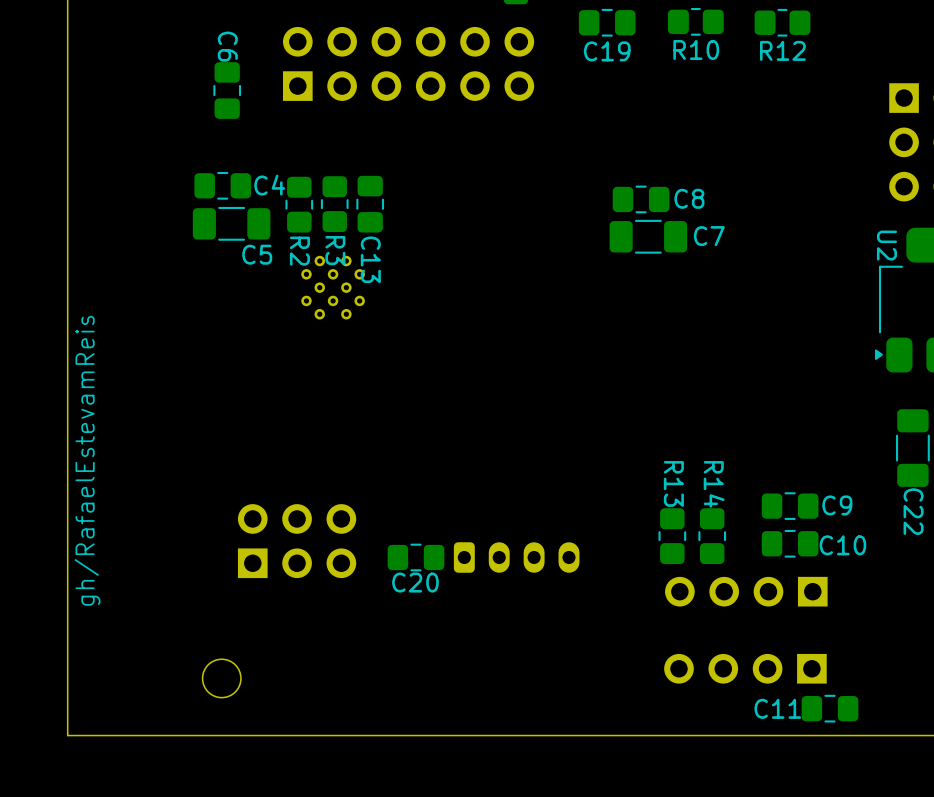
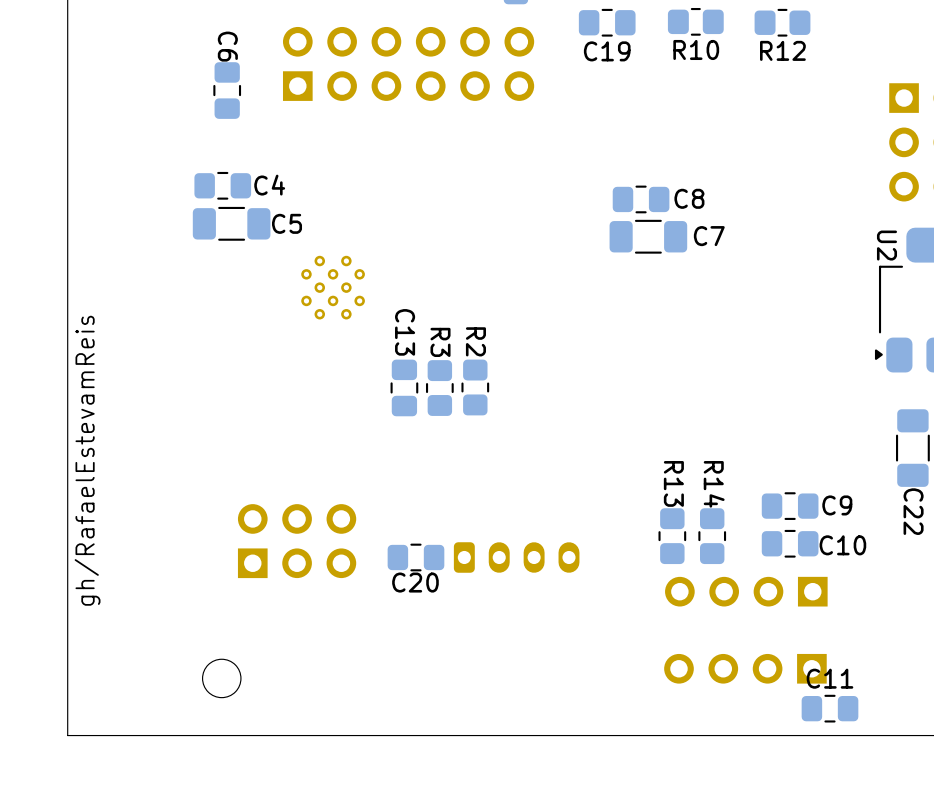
R2 position: (299, 204) -> (475, 387)
R3 position: (334, 204) -> (439, 388)
C13 position: (370, 204) -> (404, 387)
R3 name position: R3 (335, 250) -> R3 (440, 342)
R2 name position: R2 (299, 251) -> R2 (475, 341)
C5 name position: C5 (257, 254) -> C5 (287, 223)
C13 name position: C13 (370, 259) -> C13 (405, 332)
C11 name position: C11 (777, 708) -> C11 (829, 678)

